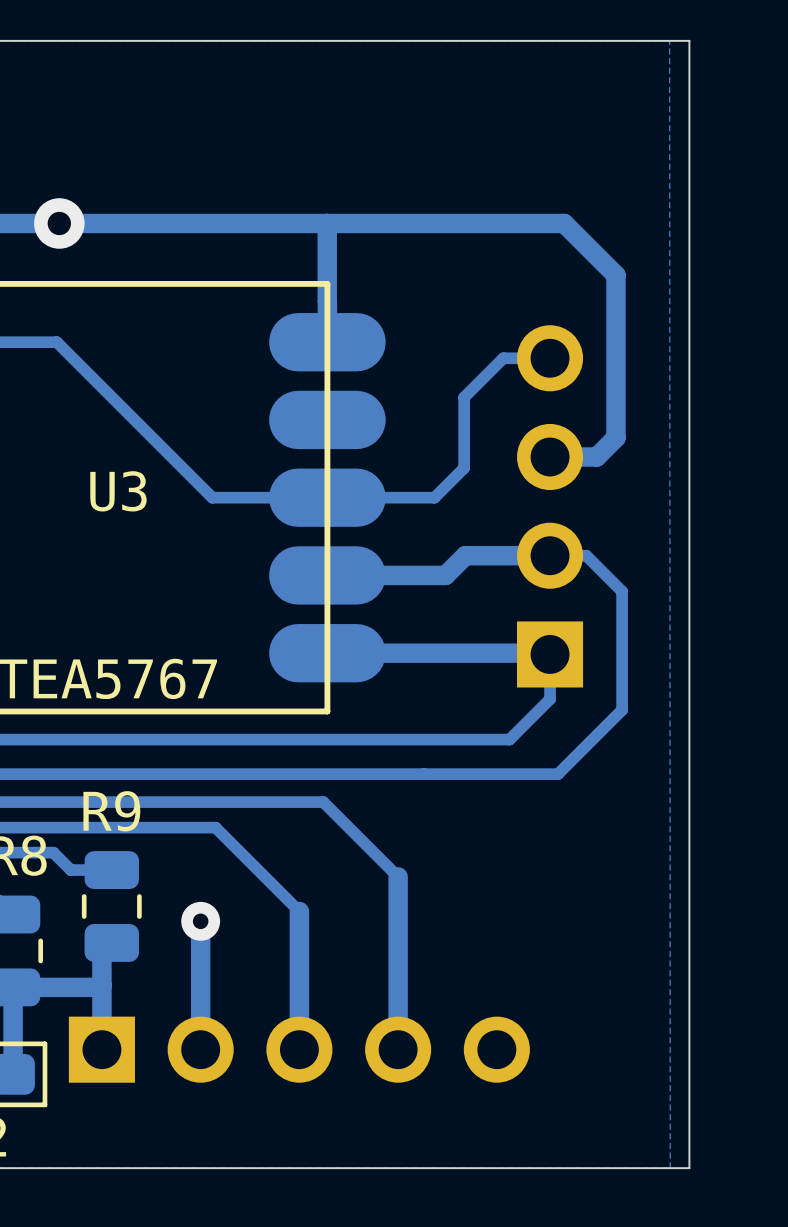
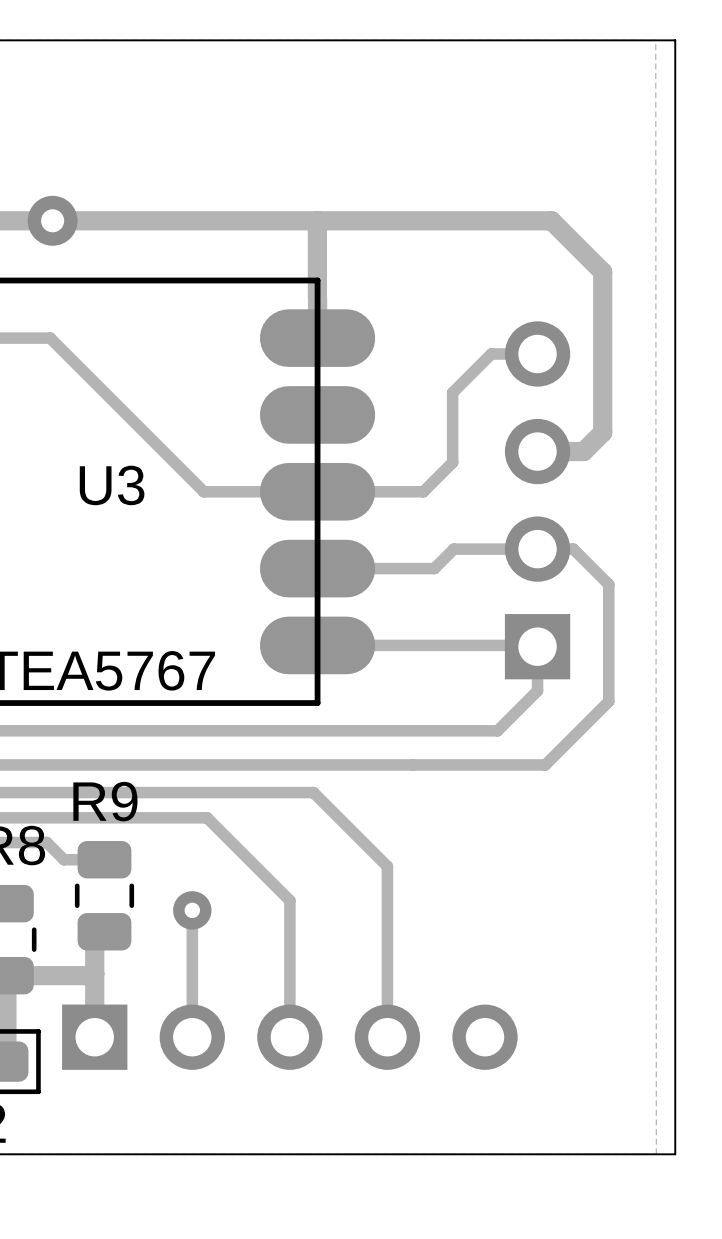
track width: thick (550, 555) (465, 555) (445, 575) (327, 575) -> thin (537, 549) (453, 549) (434, 568) (317, 568)
track width: thick (548, 653) (327, 653) -> thin (536, 645) (317, 645)
track width: thick (398, 876) (398, 1049) -> thin (387, 866) (387, 1037)
track width: thick (299, 911) (299, 1049) -> thin (289, 900) (289, 1037)
track width: thick (200, 921) (200, 1049) -> thin (192, 910) (192, 1037)

